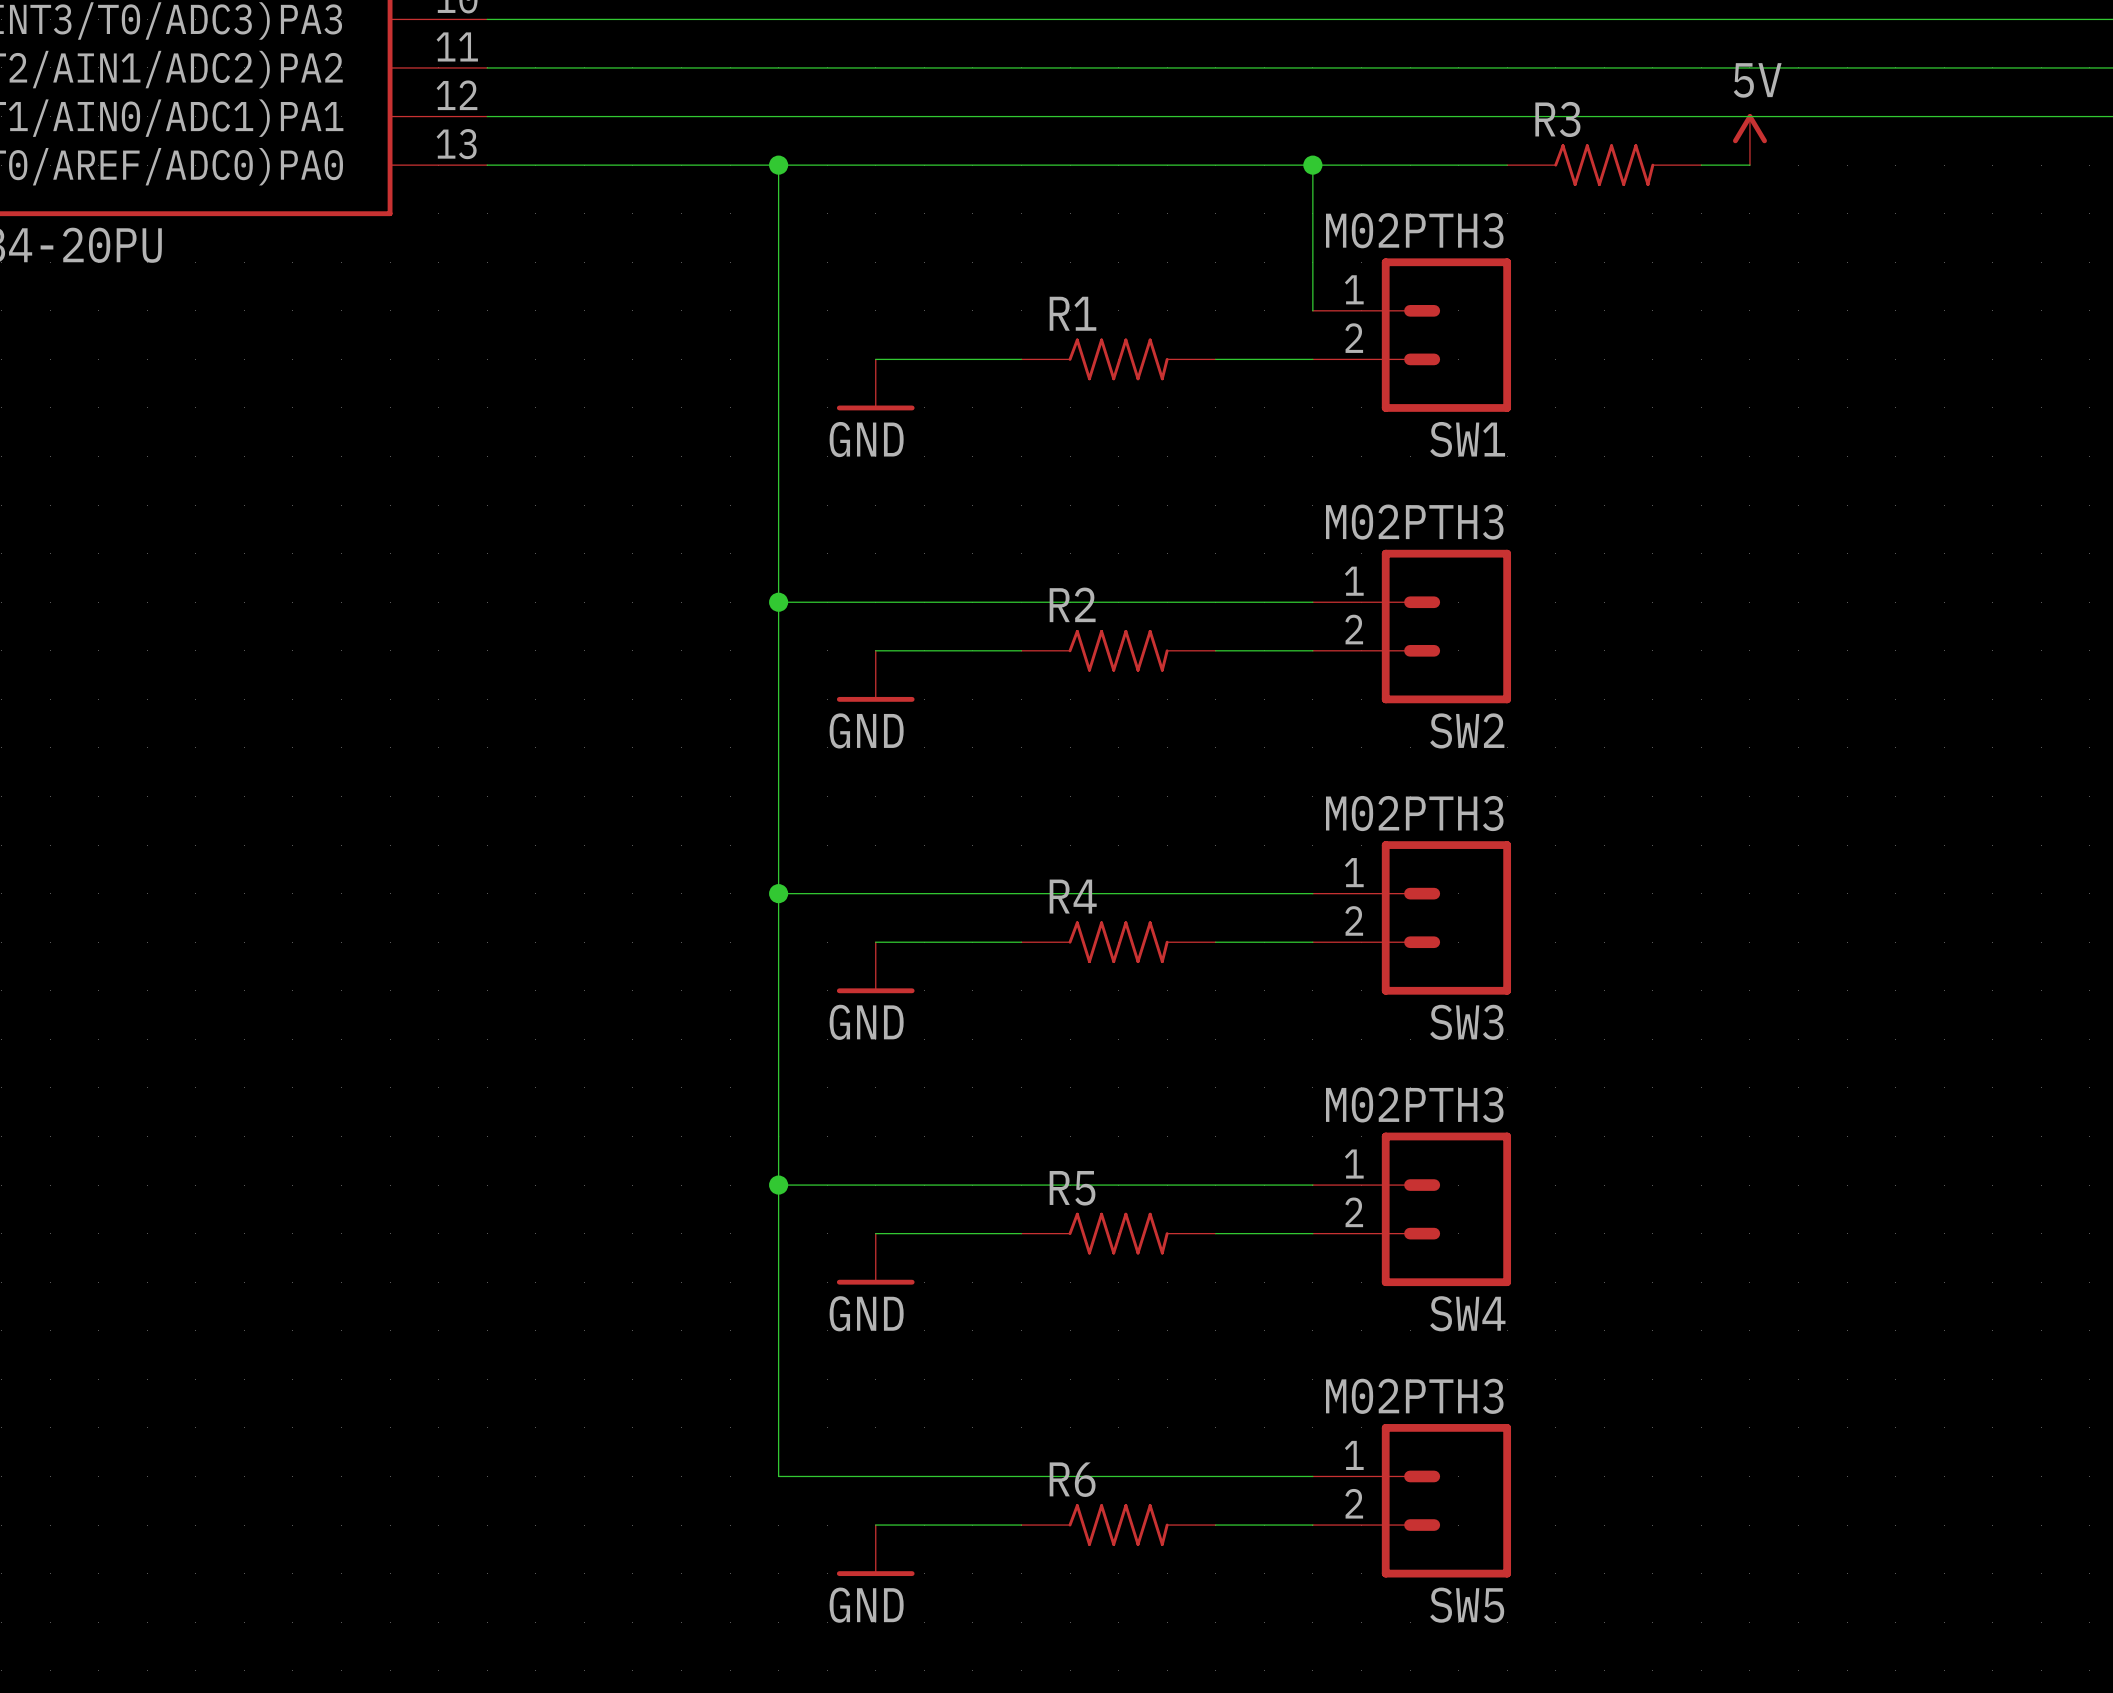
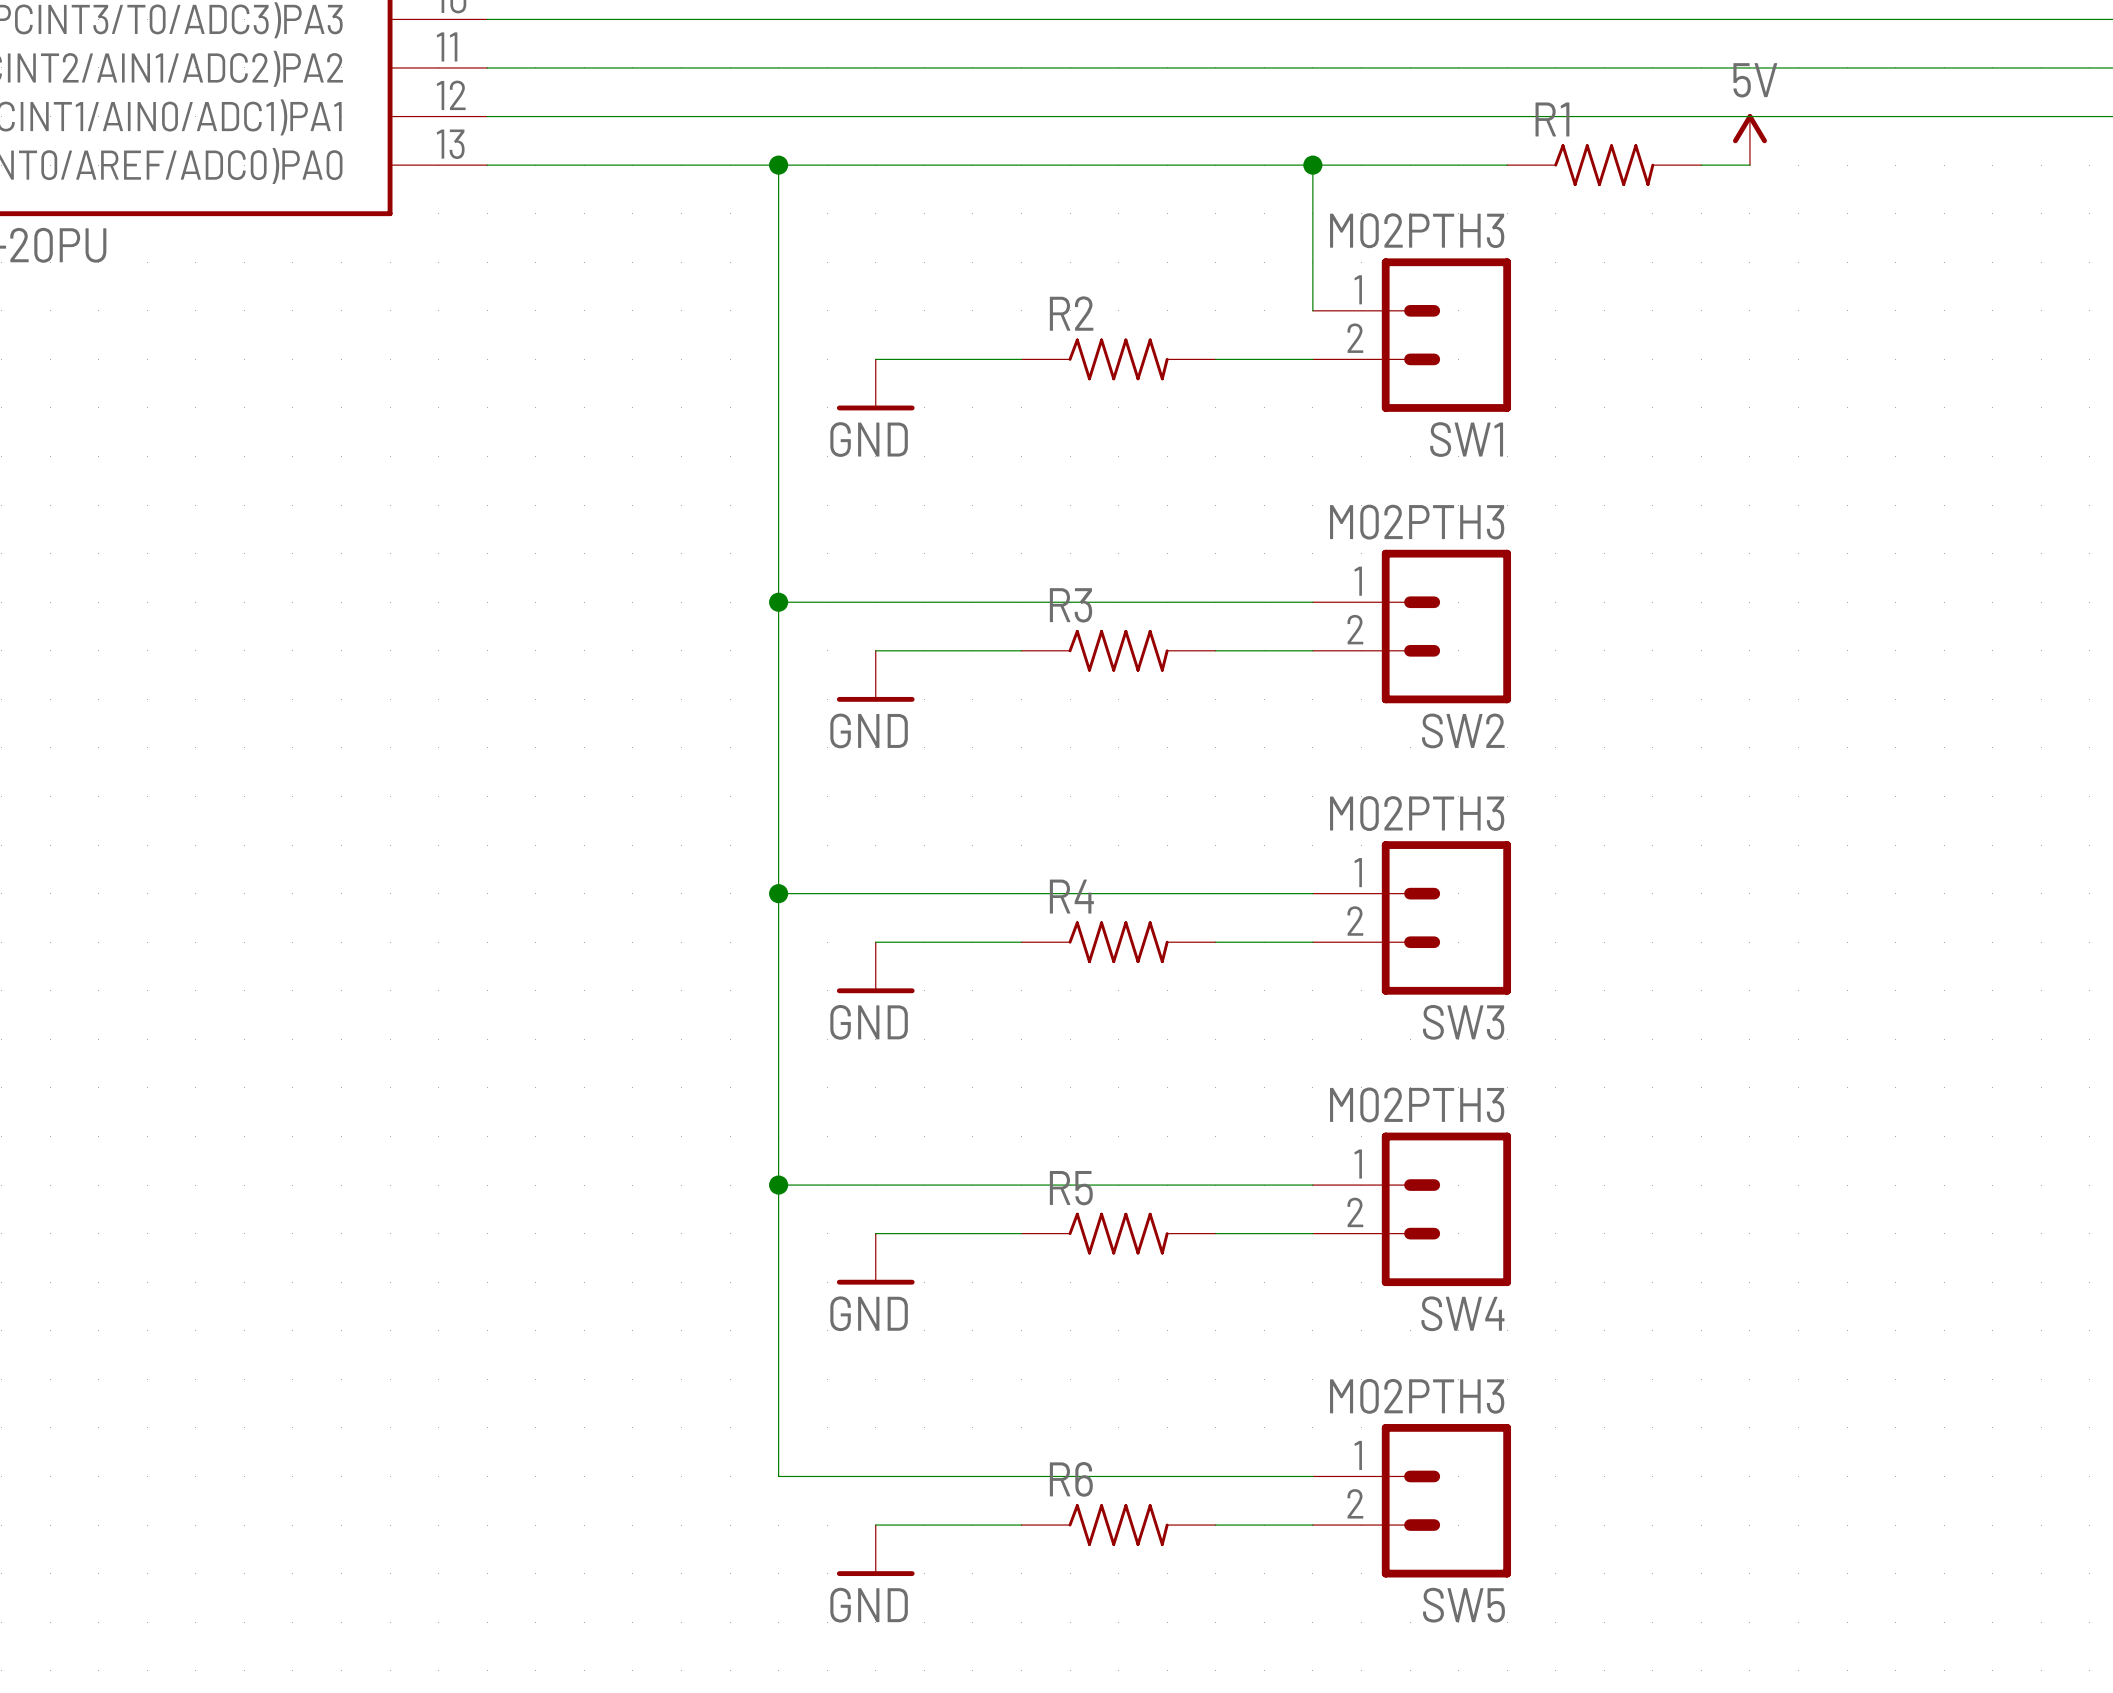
R3 name: R3 (1557, 119) -> R1 (1552, 119)
R1 name: R1 (1072, 313) -> R2 (1071, 313)
R2 name: R2 (1072, 604) -> R3 (1071, 605)

